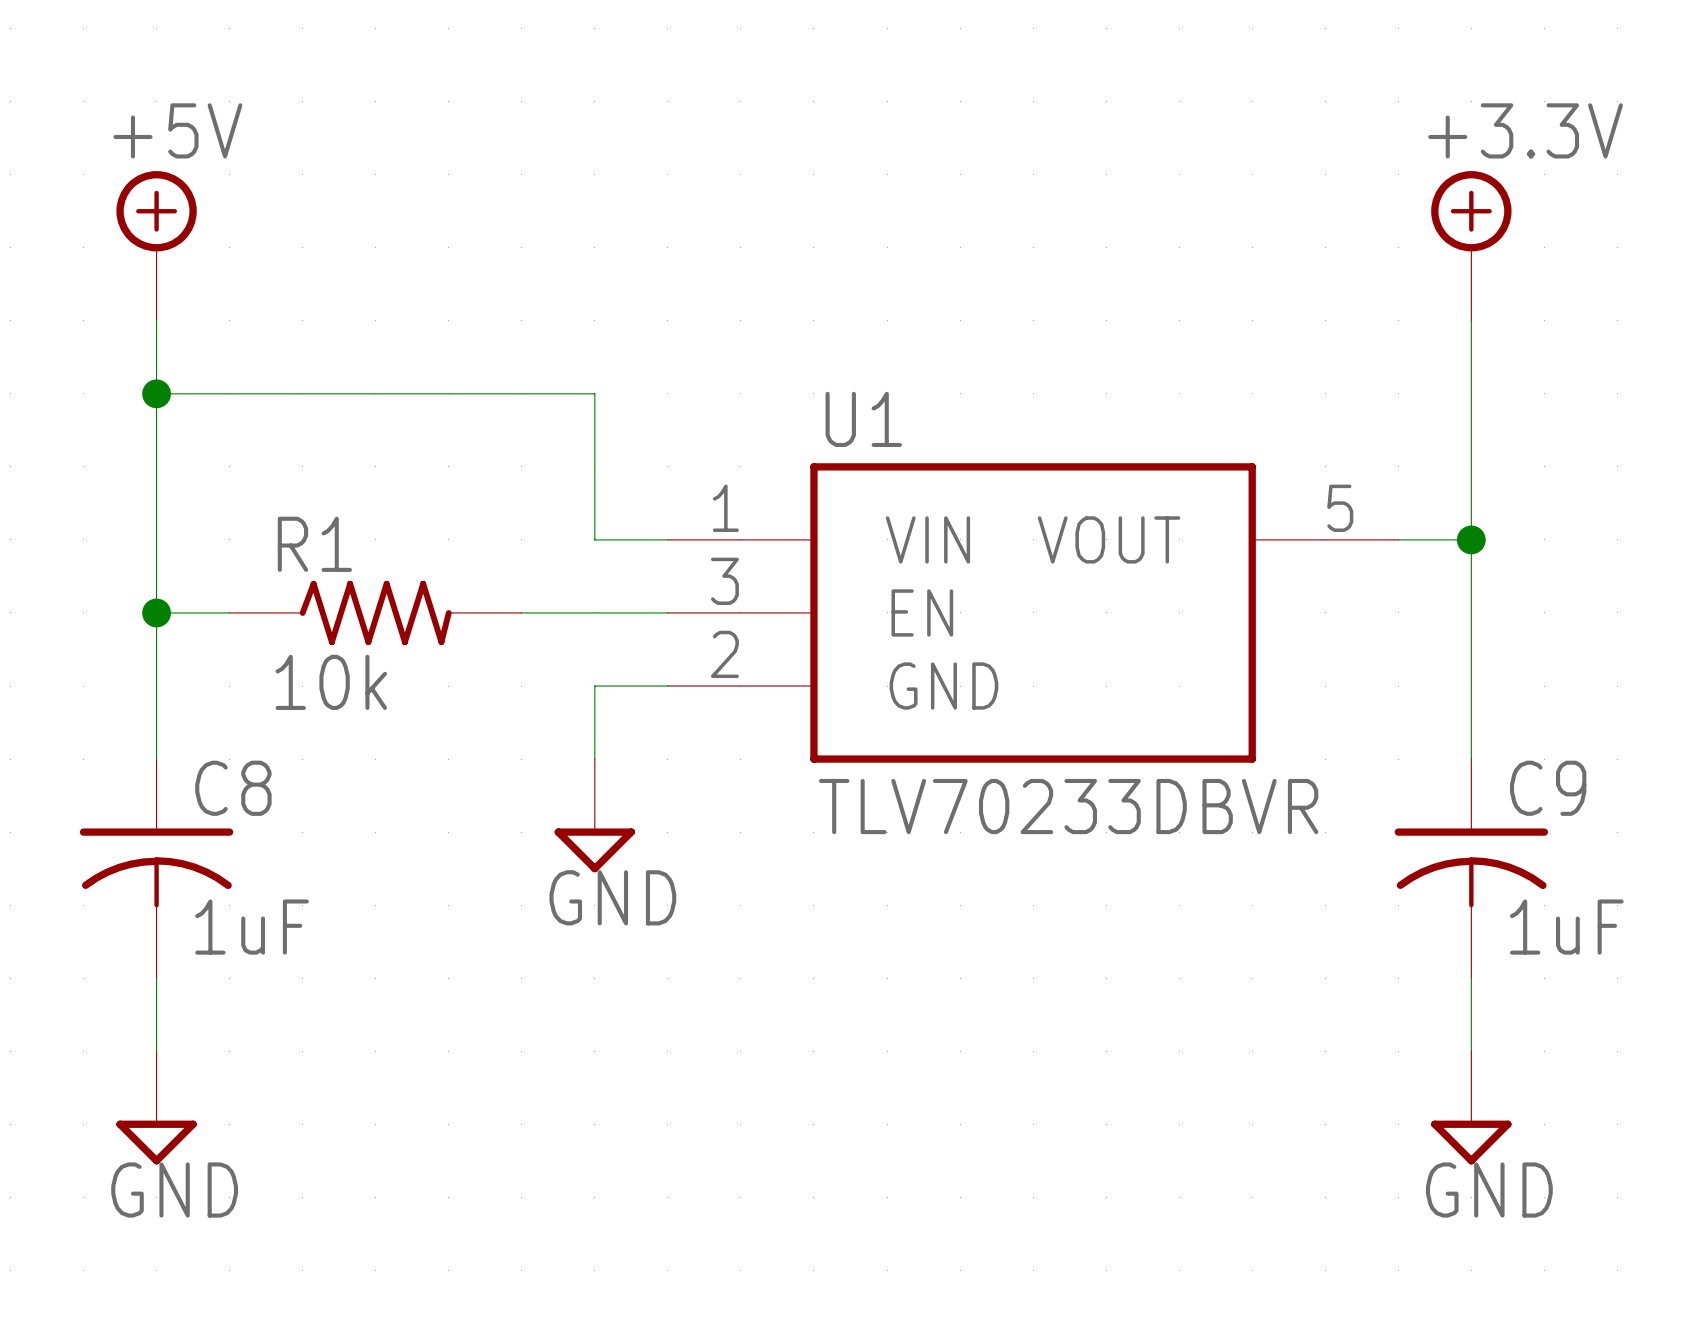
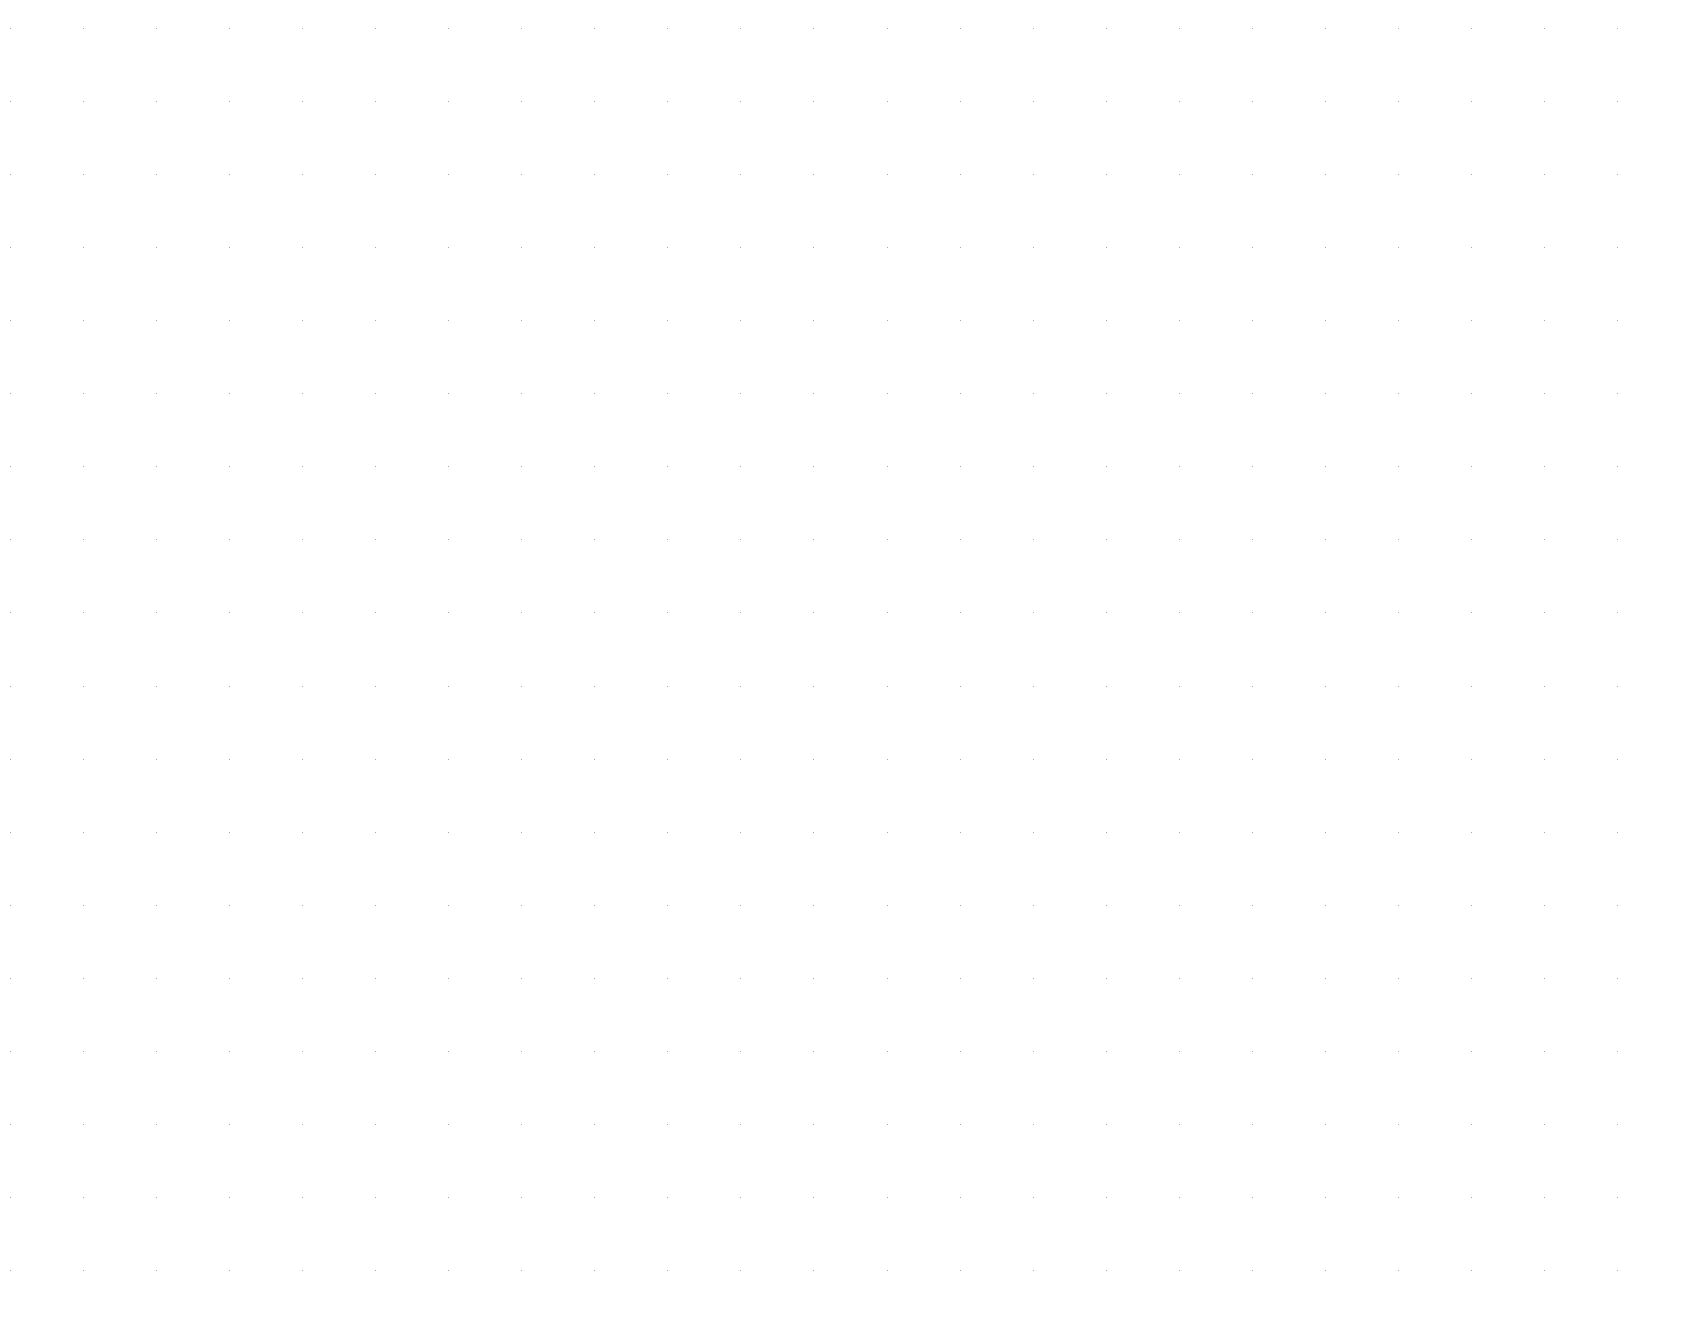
power symbol: +5V (156, 245) -> none
power symbol: +3.3V (1471, 245) -> none
wire: (156, 320) (156, 759) -> none
wire: (1471, 320) (1471, 759) -> none
wire: (156, 393) (594, 393) (594, 539) (667, 539) -> none
junction: (156, 393) -> none
wire: (1398, 539) (1471, 539) -> none
junction: (1471, 539) -> none
wire: (156, 612) (229, 612) -> none
junction: (156, 612) -> none
R1: 10k (375, 612) -> none
wire: (521, 612) (667, 612) -> none
U1: TLV70233DBVR (1033, 612) -> none
wire: (667, 686) (594, 686) (594, 759) -> none
power symbol: GND (594, 815) -> none
C8: 1uF (156, 868) -> none
C9: 1uF (1471, 868) -> none
wire: (156, 978) (156, 1051) -> none
wire: (1471, 978) (1471, 1051) -> none
power symbol: GND (156, 1107) -> none
power symbol: GND (1471, 1107) -> none

